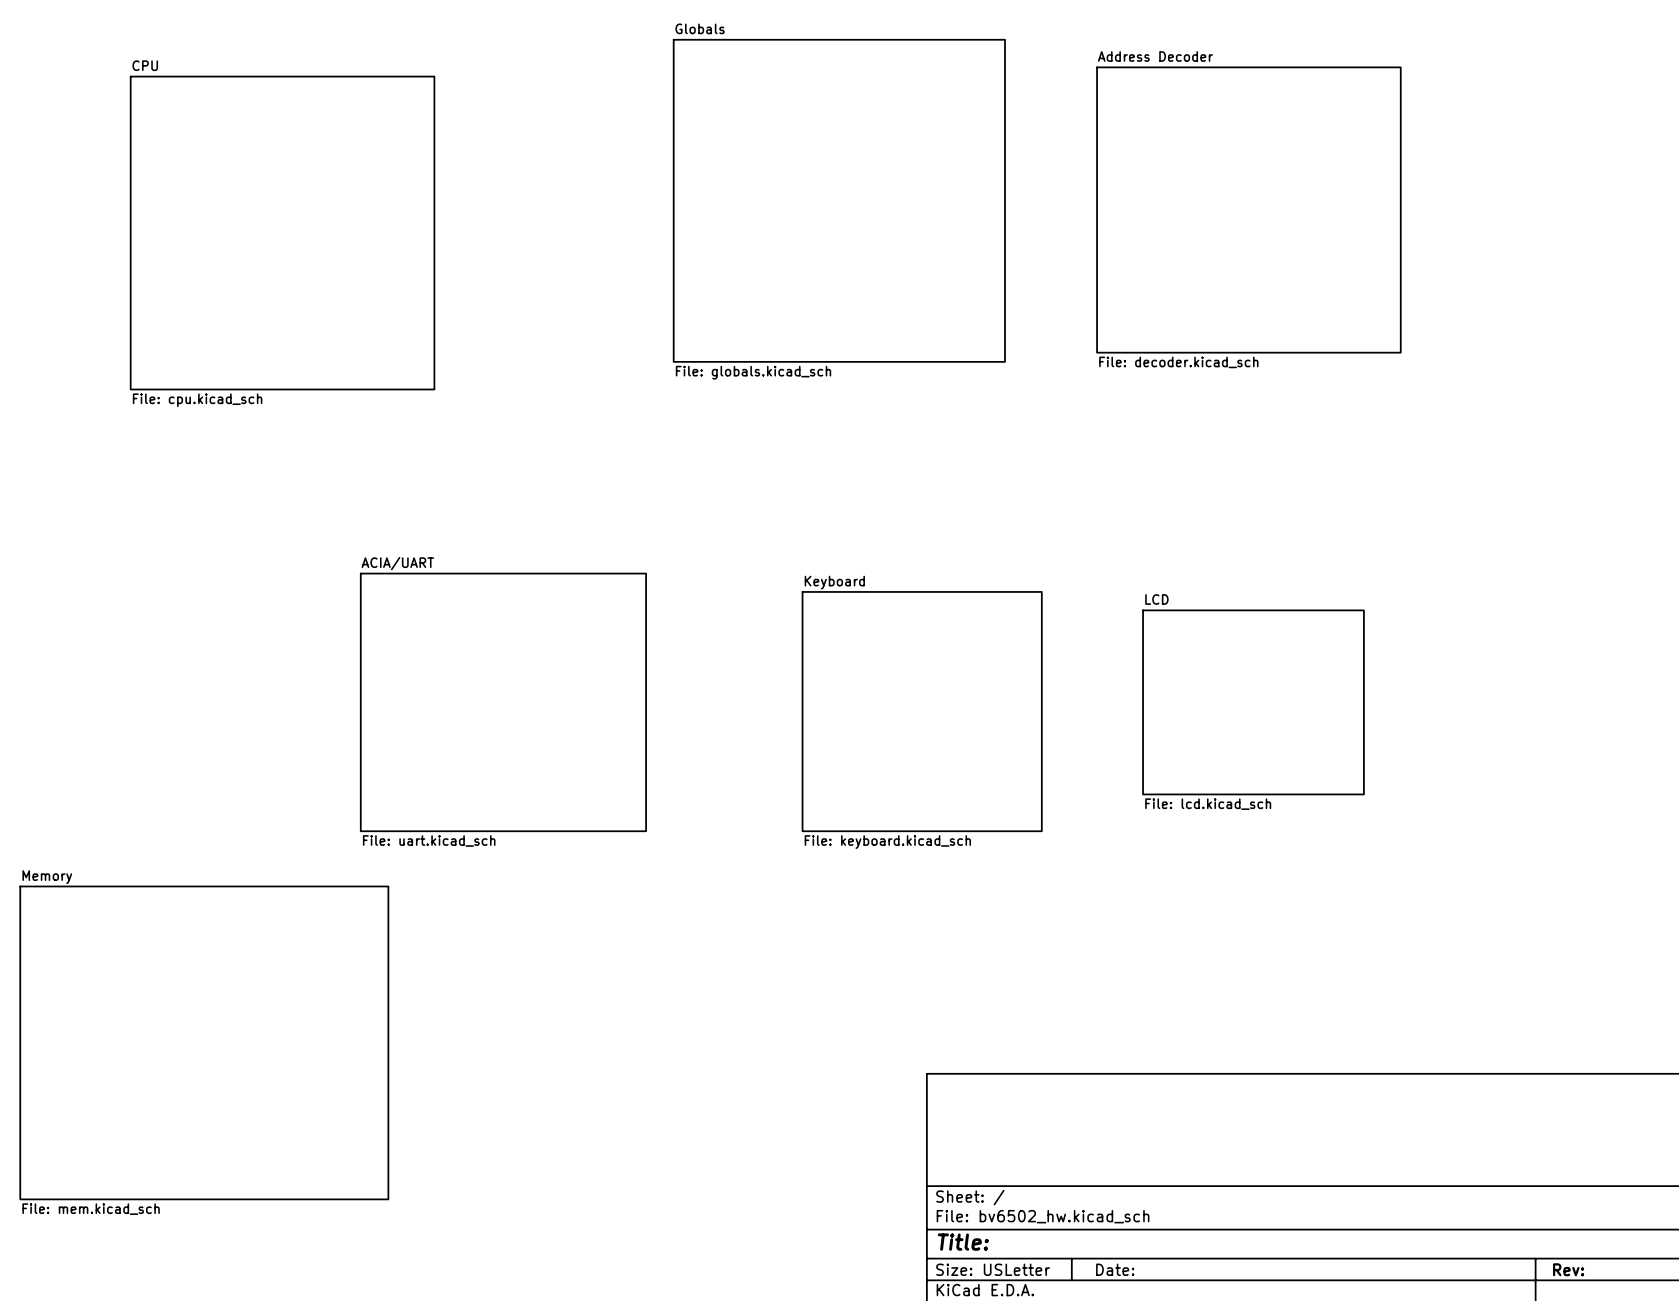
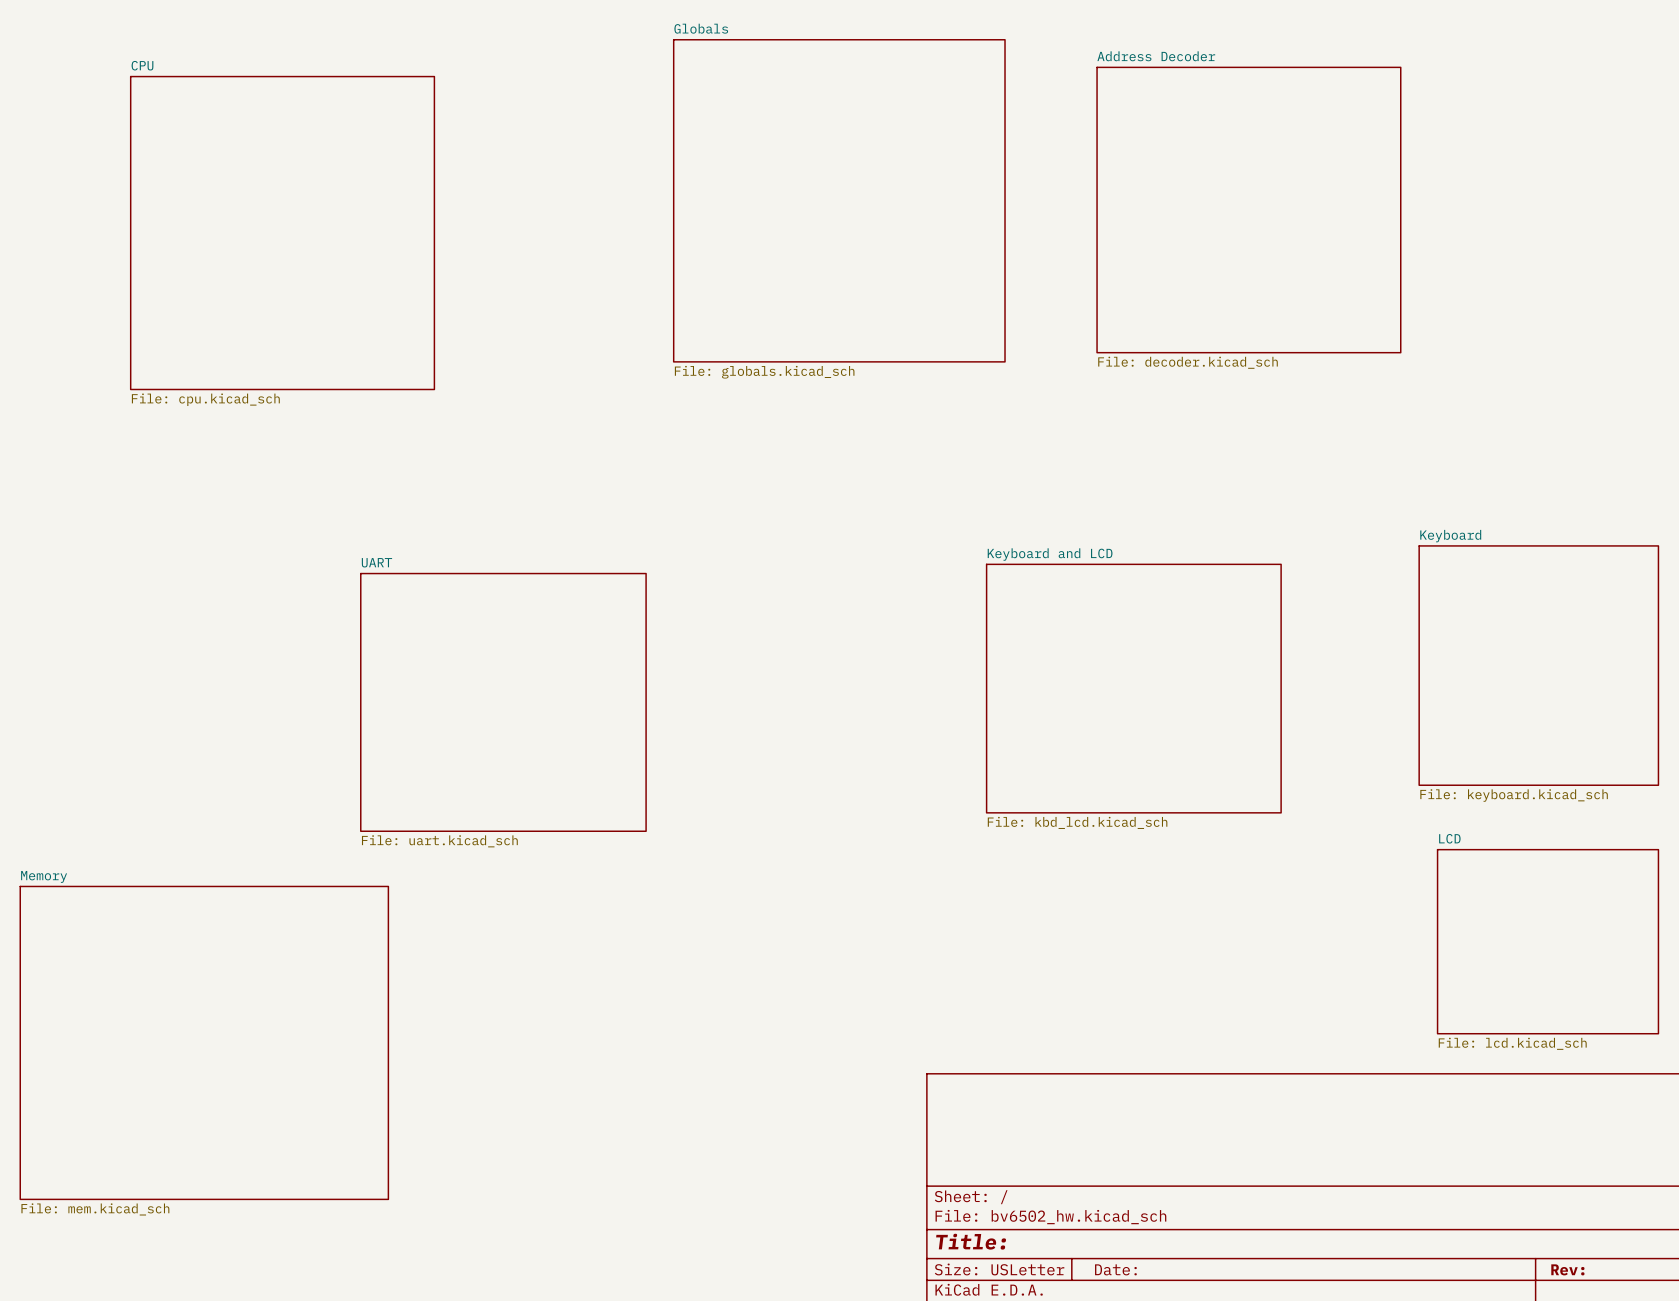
sheet ACIA/UART name: ACIA/UART (397, 563) -> UART (376, 562)
sheet Keyboard: none -> File: keyboard.kicad_sch (1538, 665)
sheet Keyboard and LCD: none -> File: kbd_lcd.kicad_sch (1133, 688)
sheet LCD: File: lcd.kicad_sch (1253, 702) -> none
sheet Keyboard: File: keyboard.kicad_sch (922, 711) -> none
sheet LCD: none -> File: lcd.kicad_sch (1548, 941)

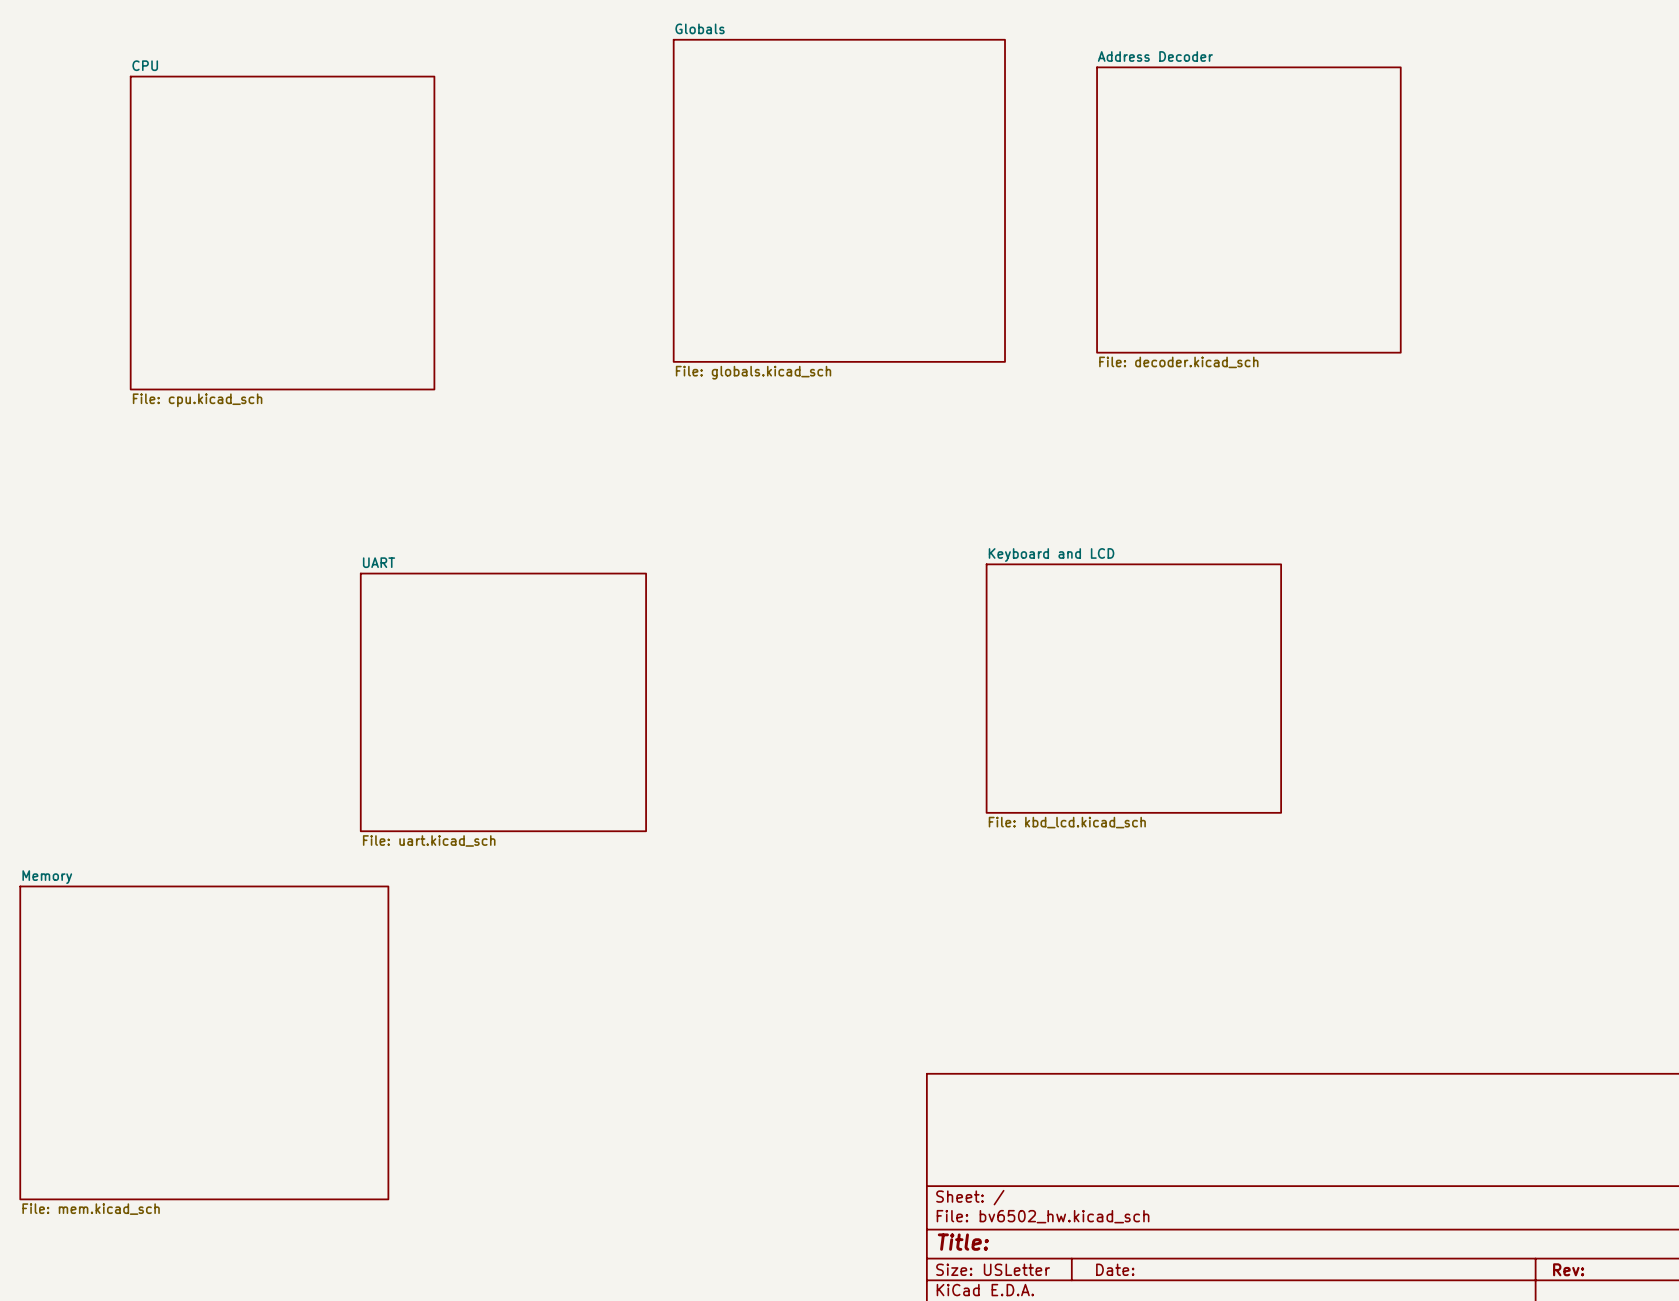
sheet Keyboard: File: keyboard.kicad_sch (1538, 665) -> none
sheet LCD: File: lcd.kicad_sch (1548, 941) -> none

